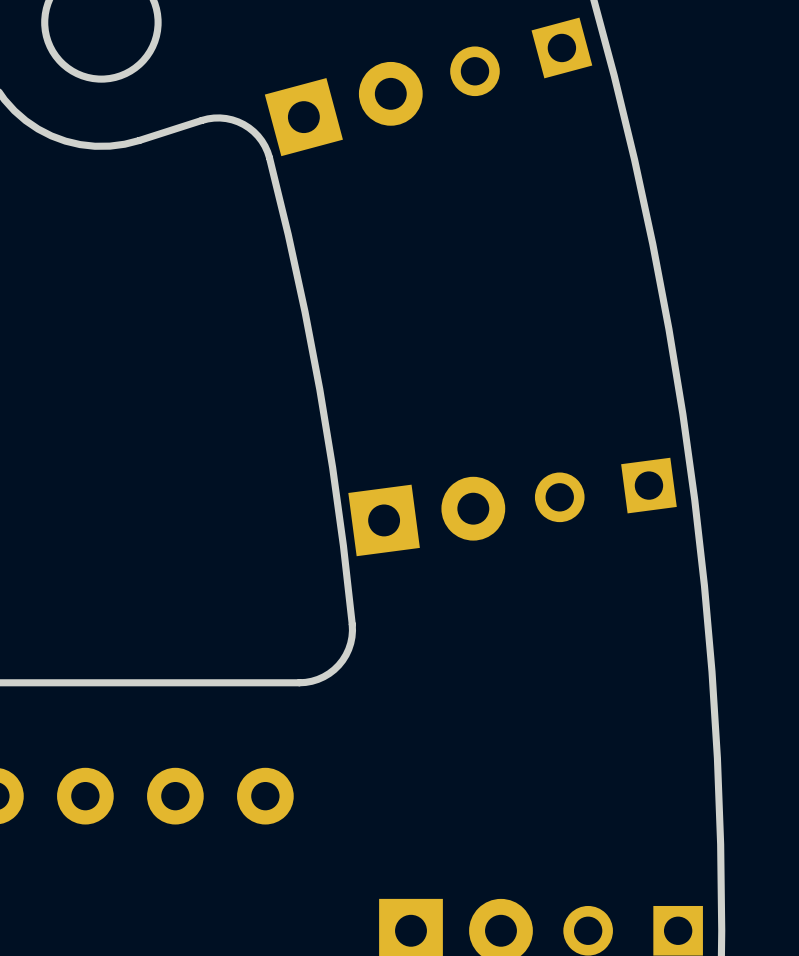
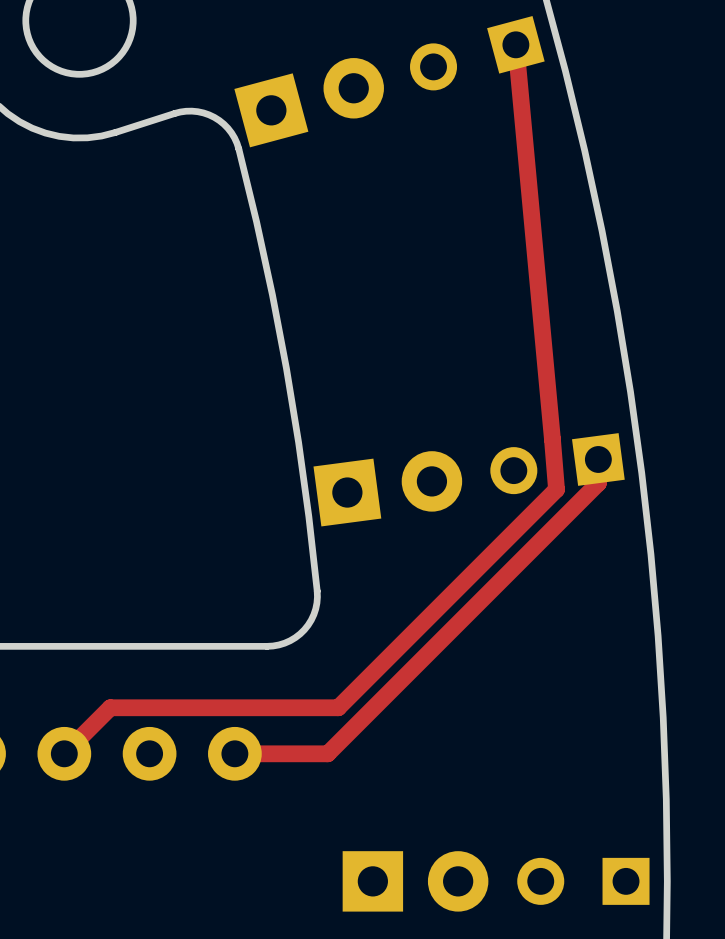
track: none -> (515, 44) (556, 489) (338, 707) (110, 707) (64, 753)
track: none -> (598, 459) (598, 483) (327, 753) (234, 753)

